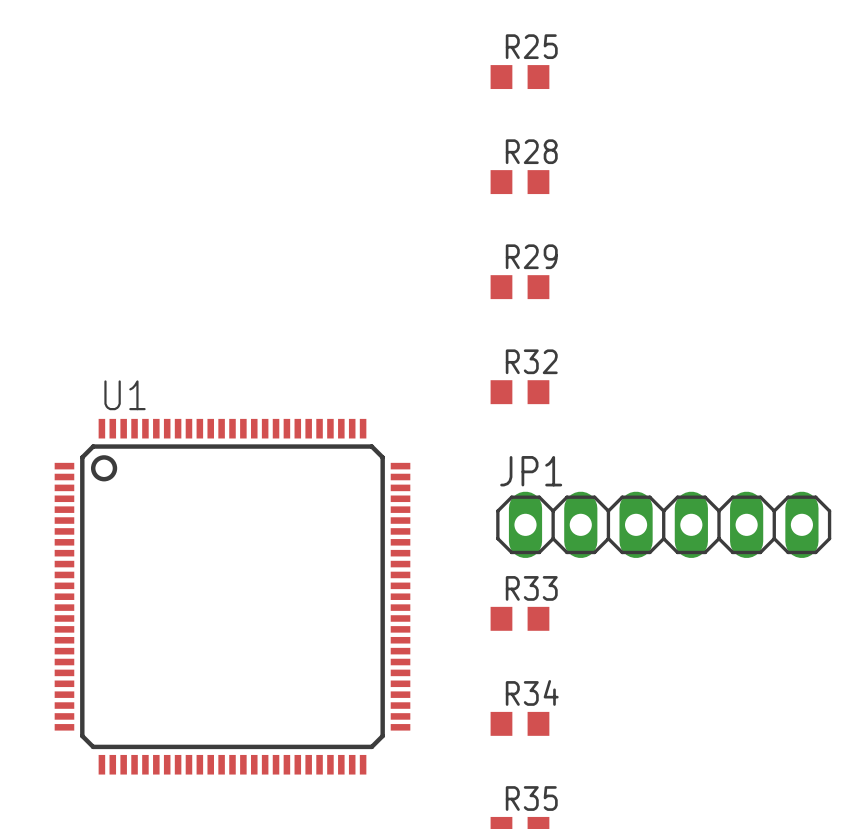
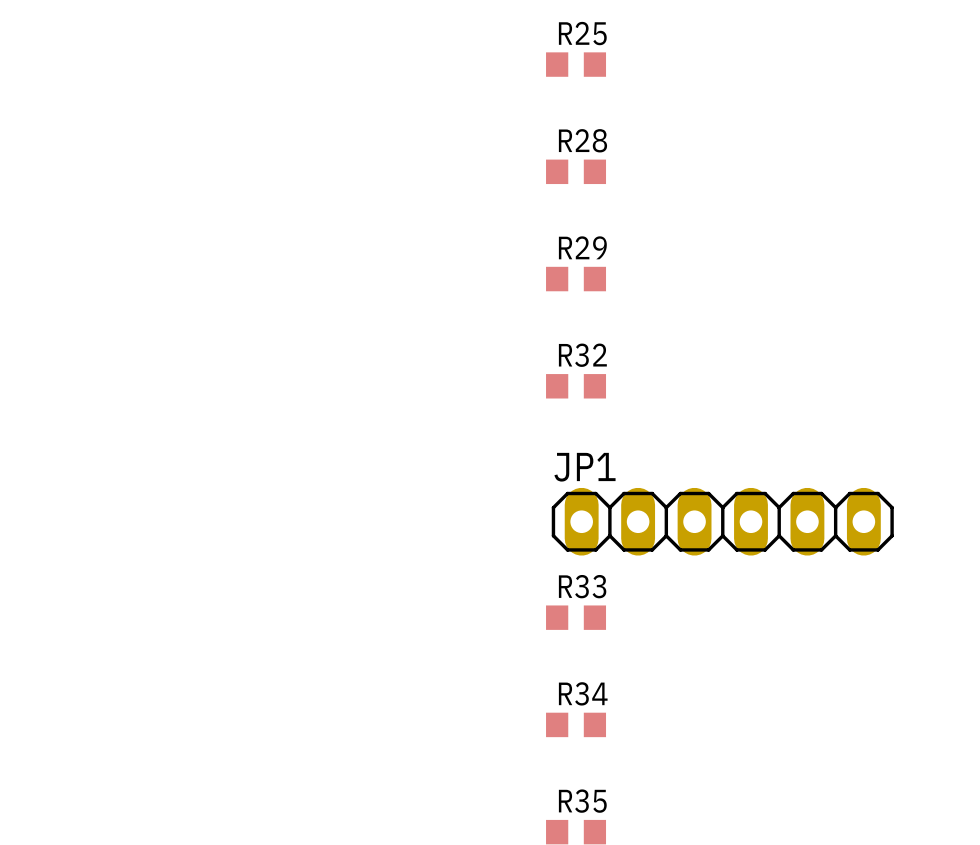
U1: (232, 596) -> none

